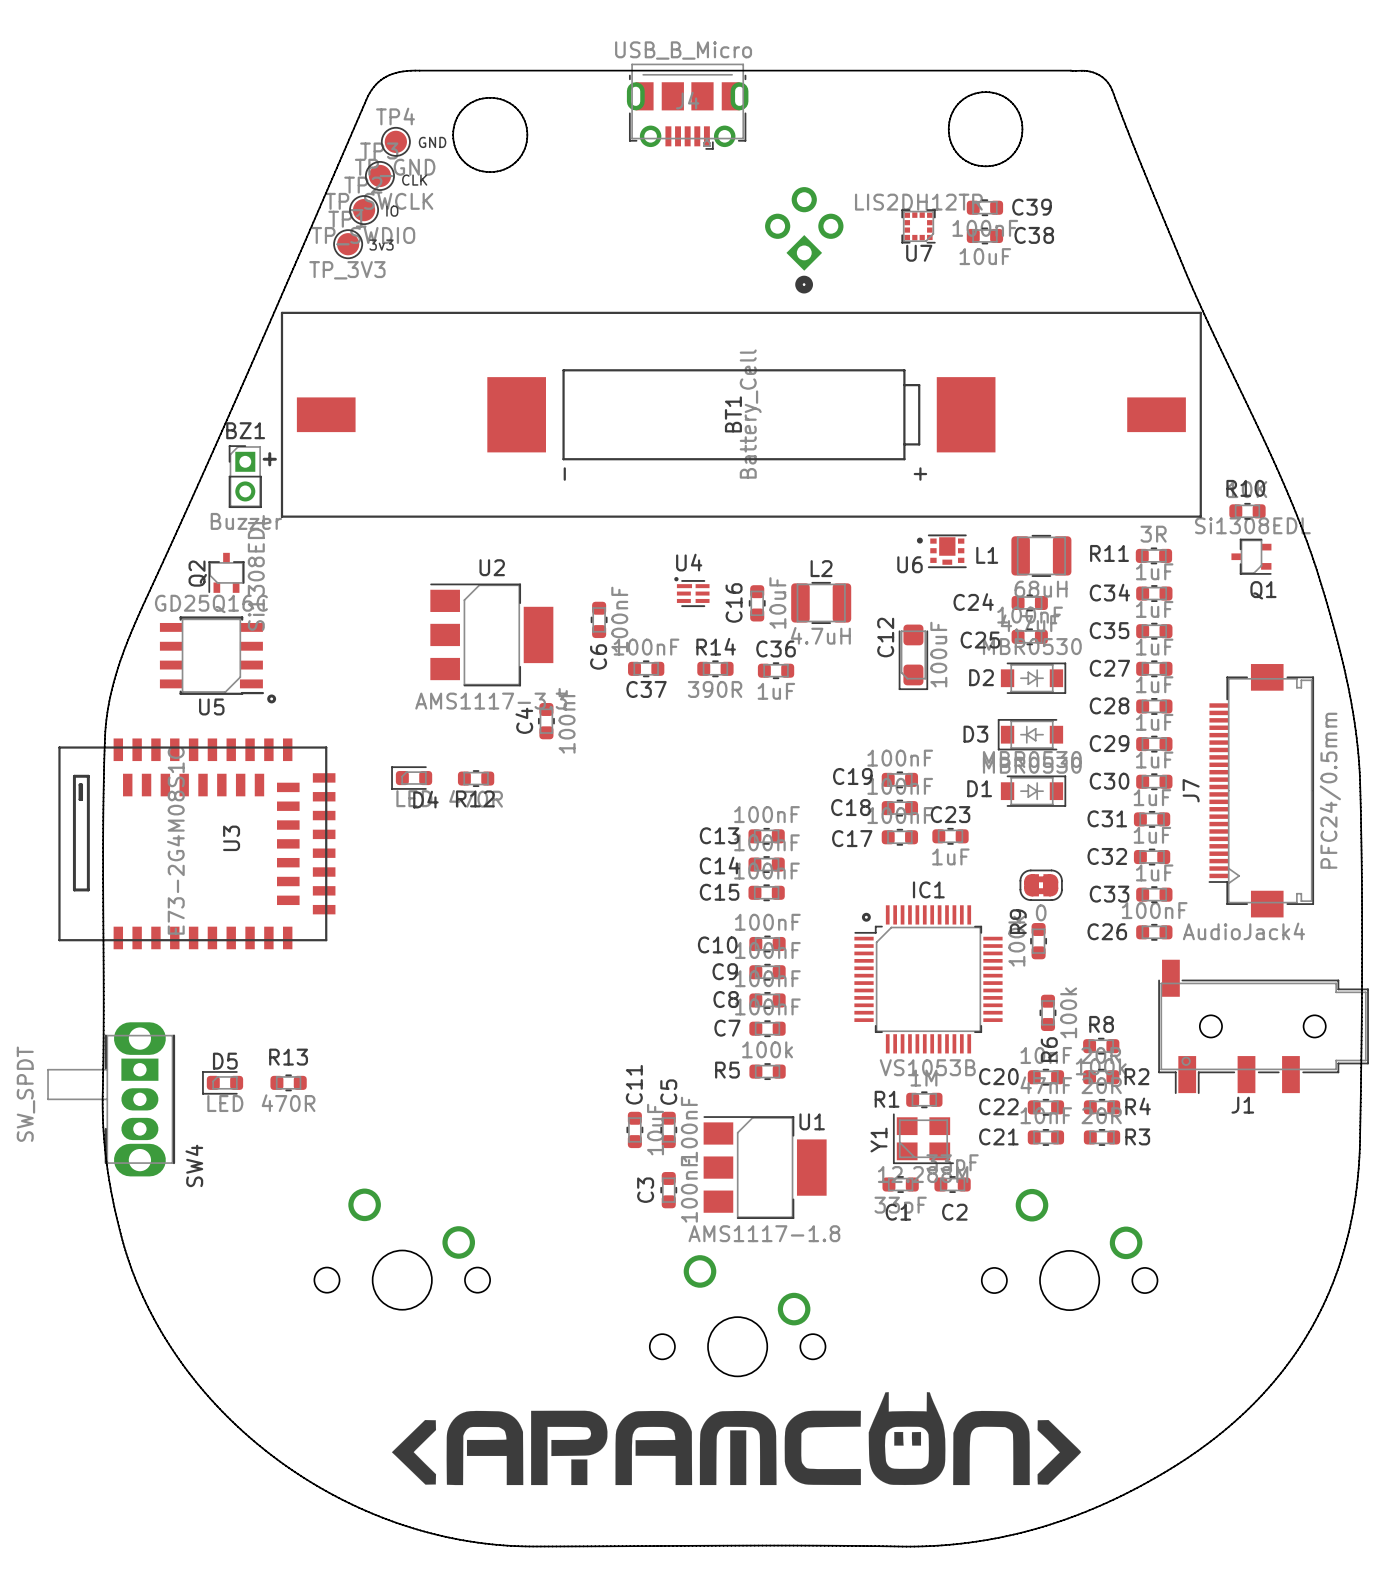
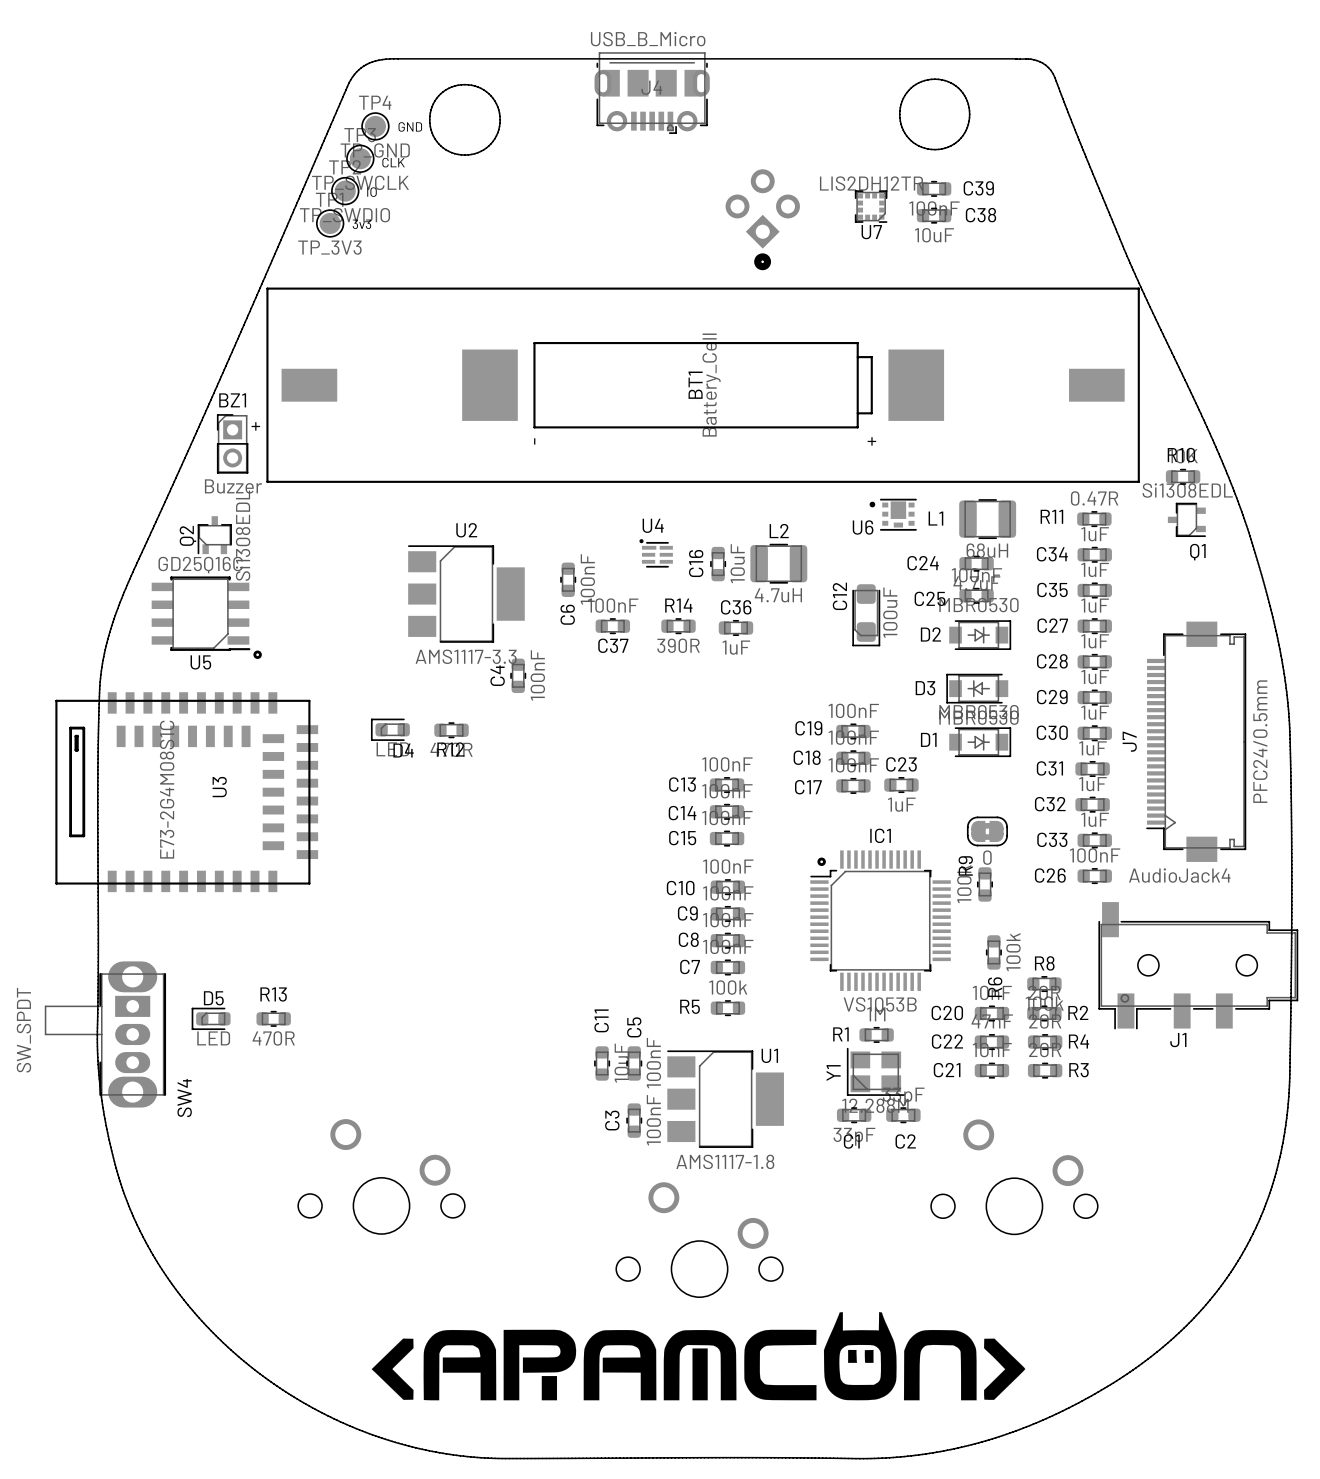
R11 value: 3R (1153, 534) -> 0.47R (1094, 498)

